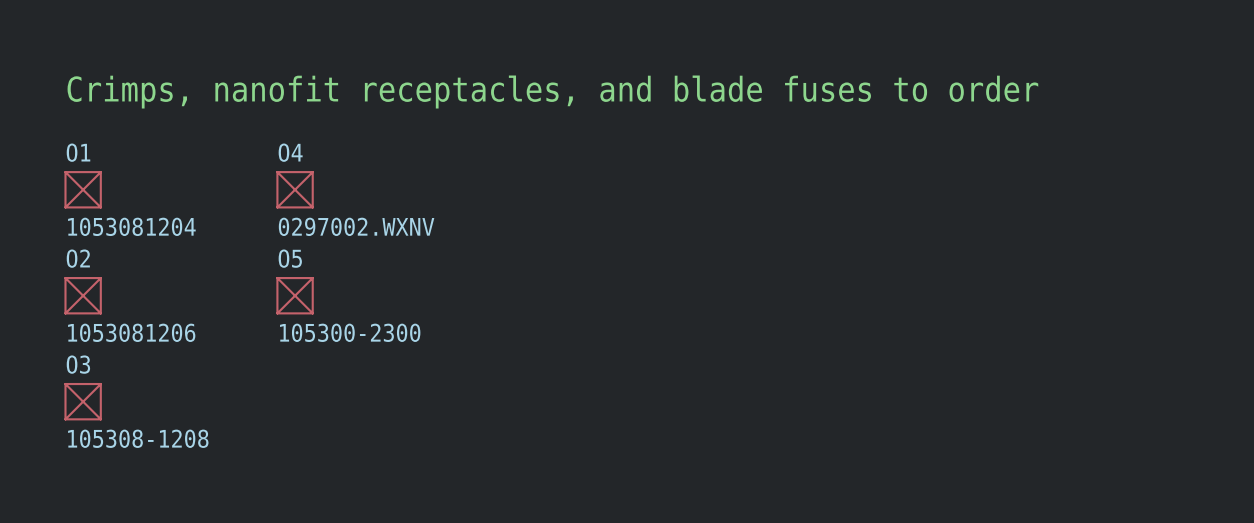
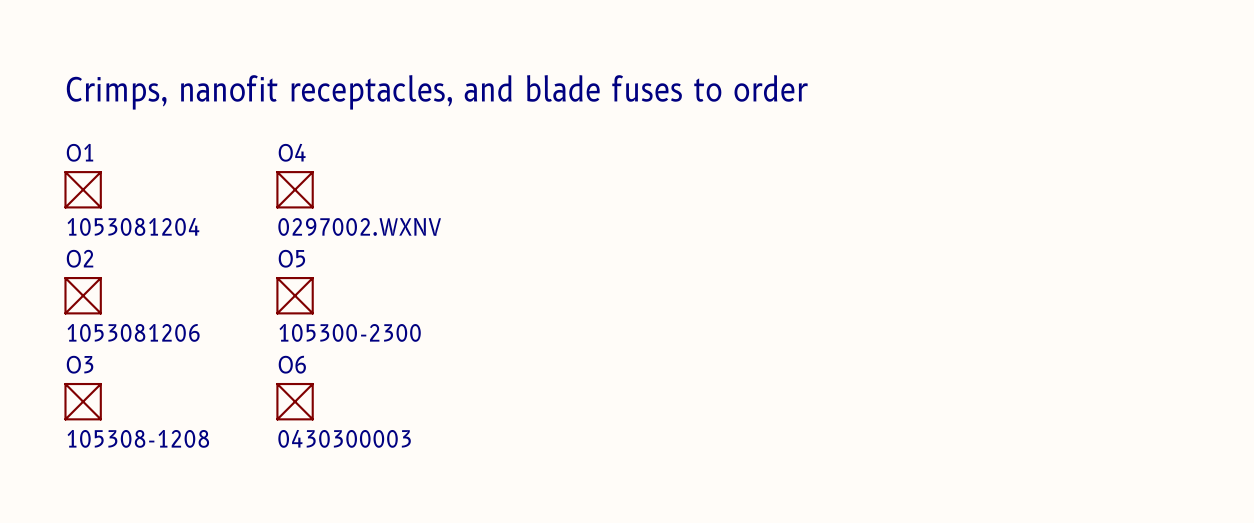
O6: none -> (295, 401)

